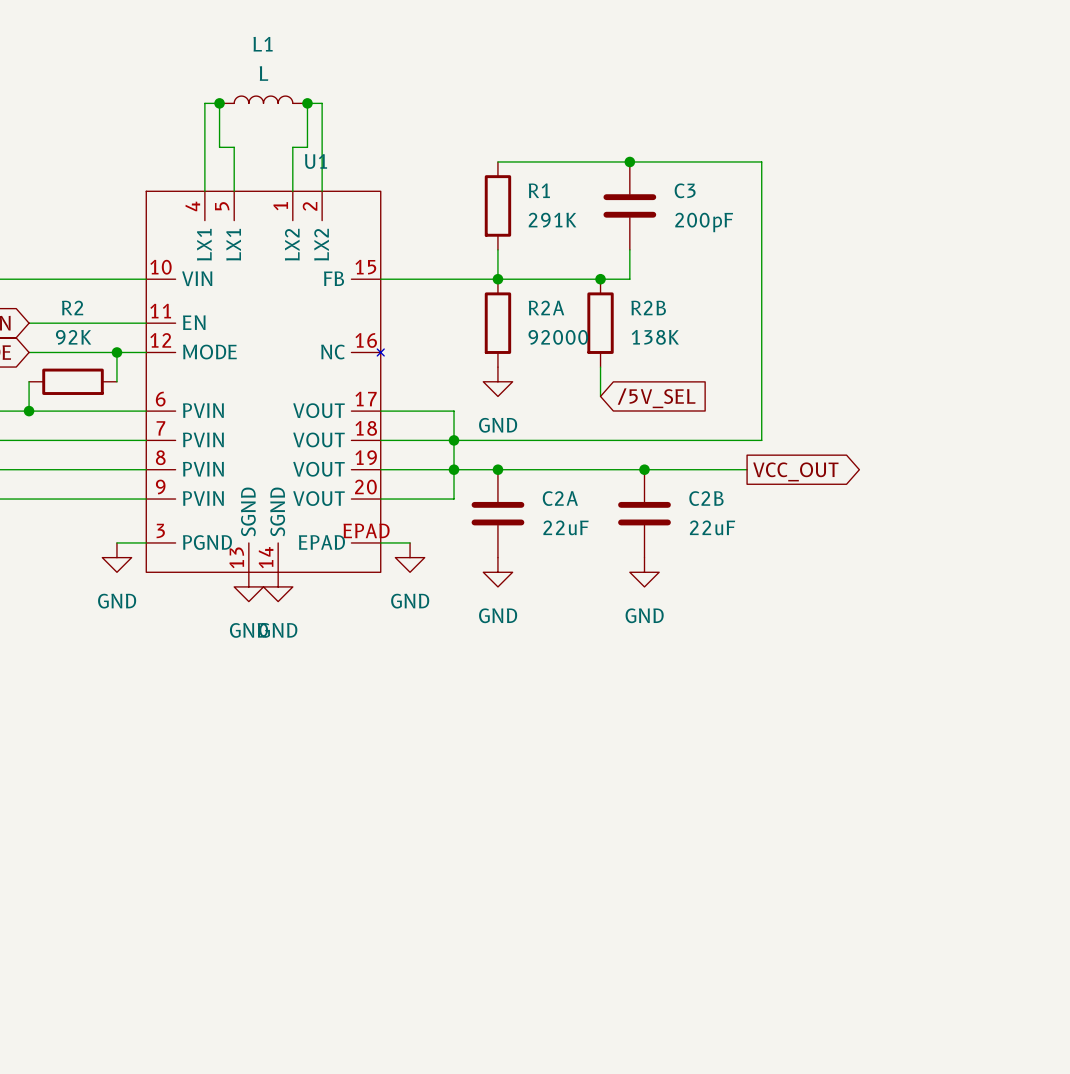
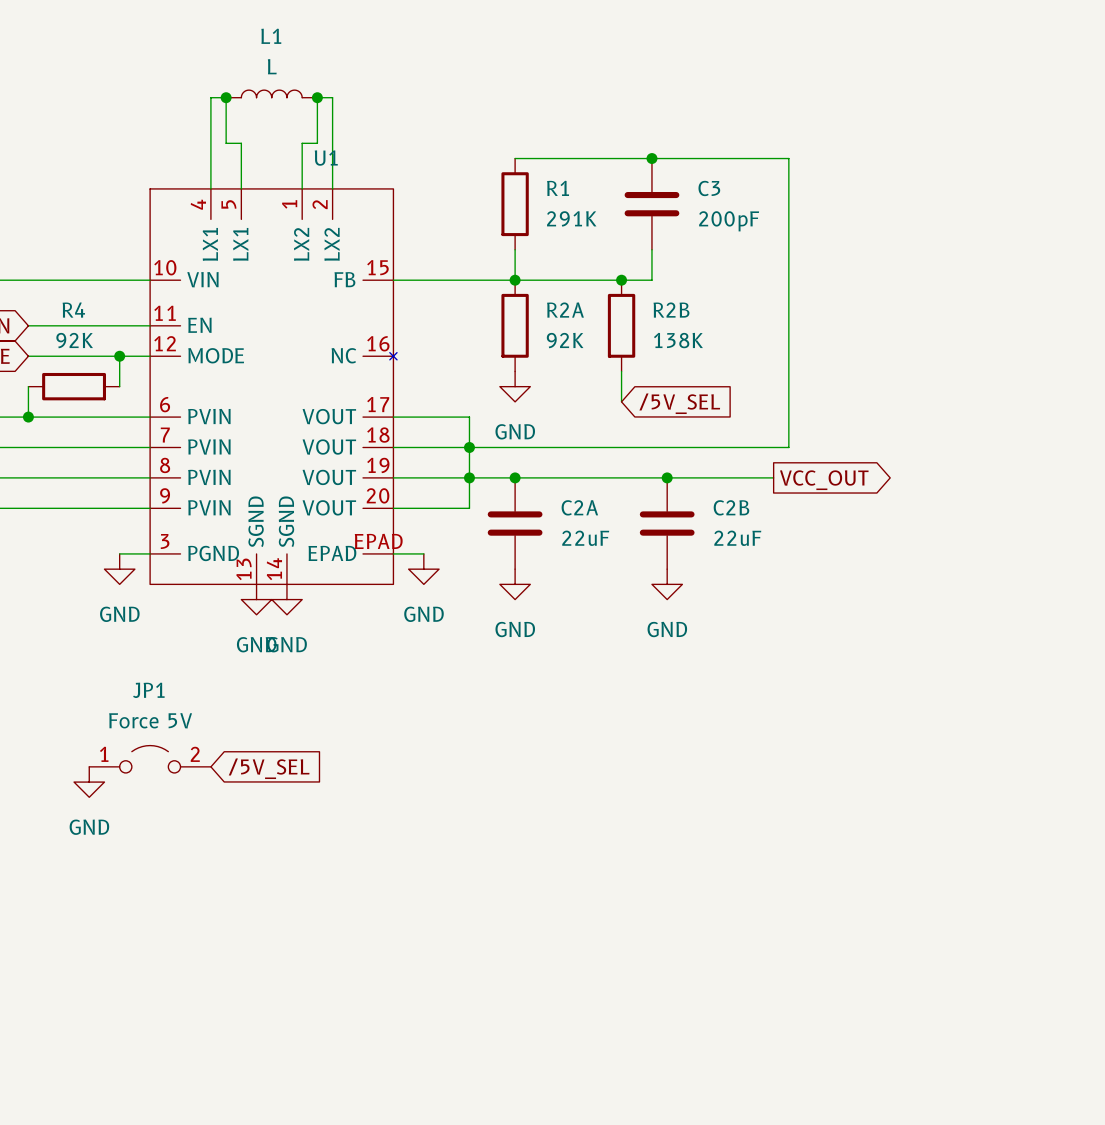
R2 name: R2 (72, 307) -> R4 (73, 310)
R2A value: 92000 (558, 337) -> 92K (565, 340)
JP1: none -> Force 5V (150, 759)
global label: none -> /5V_SEL (269, 768)
power symbol: none -> GND (89, 782)

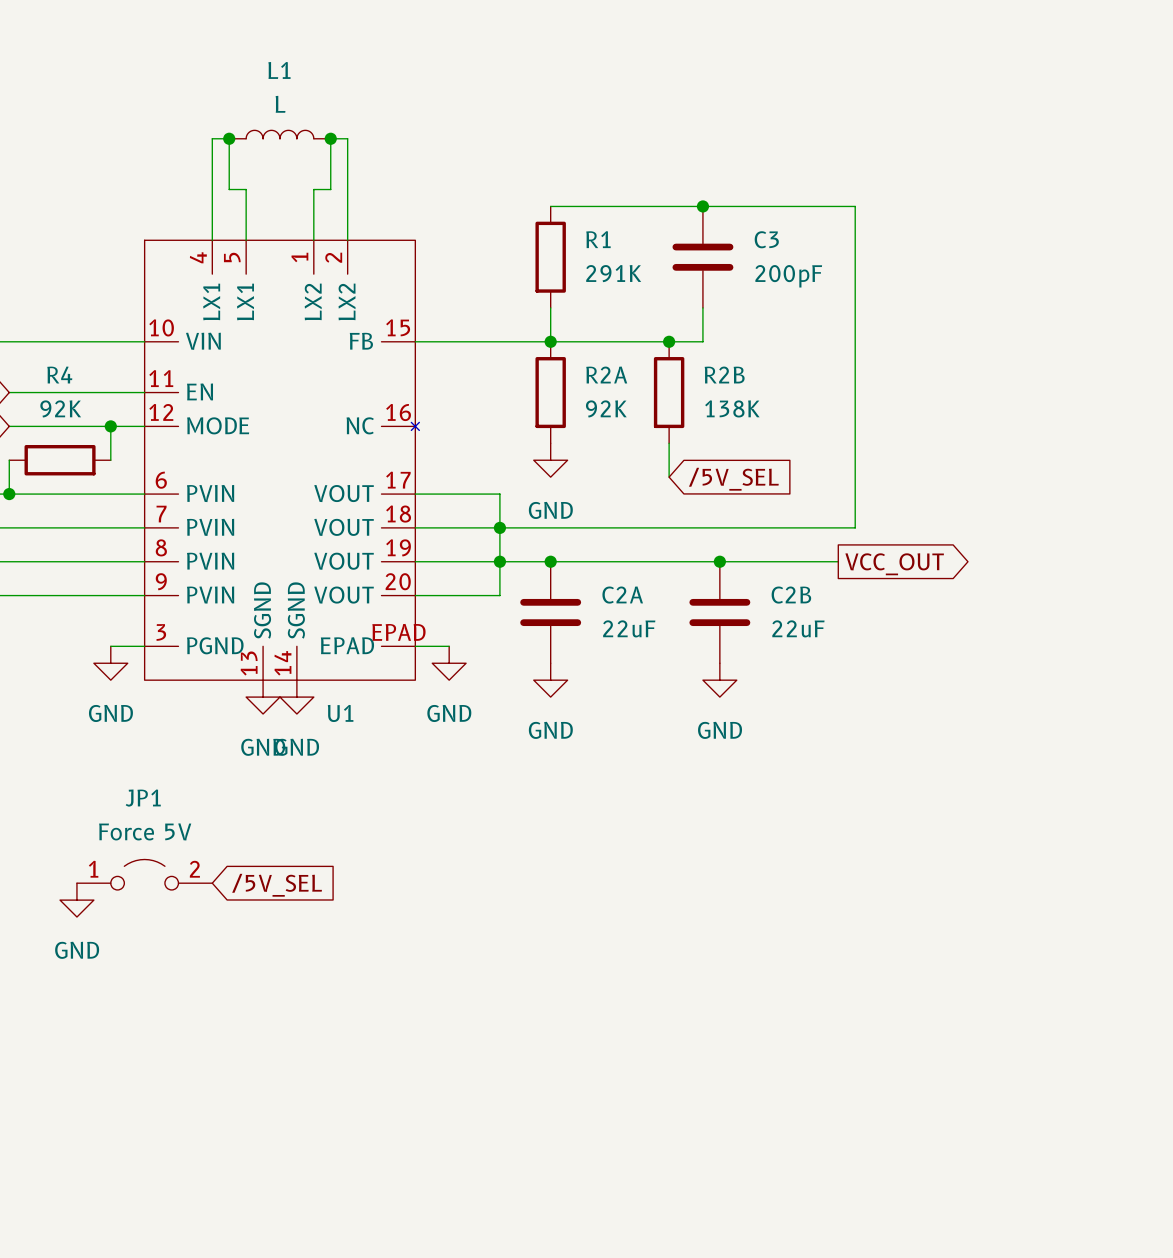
U1 name position: U1 (326, 158) -> U1 (340, 713)

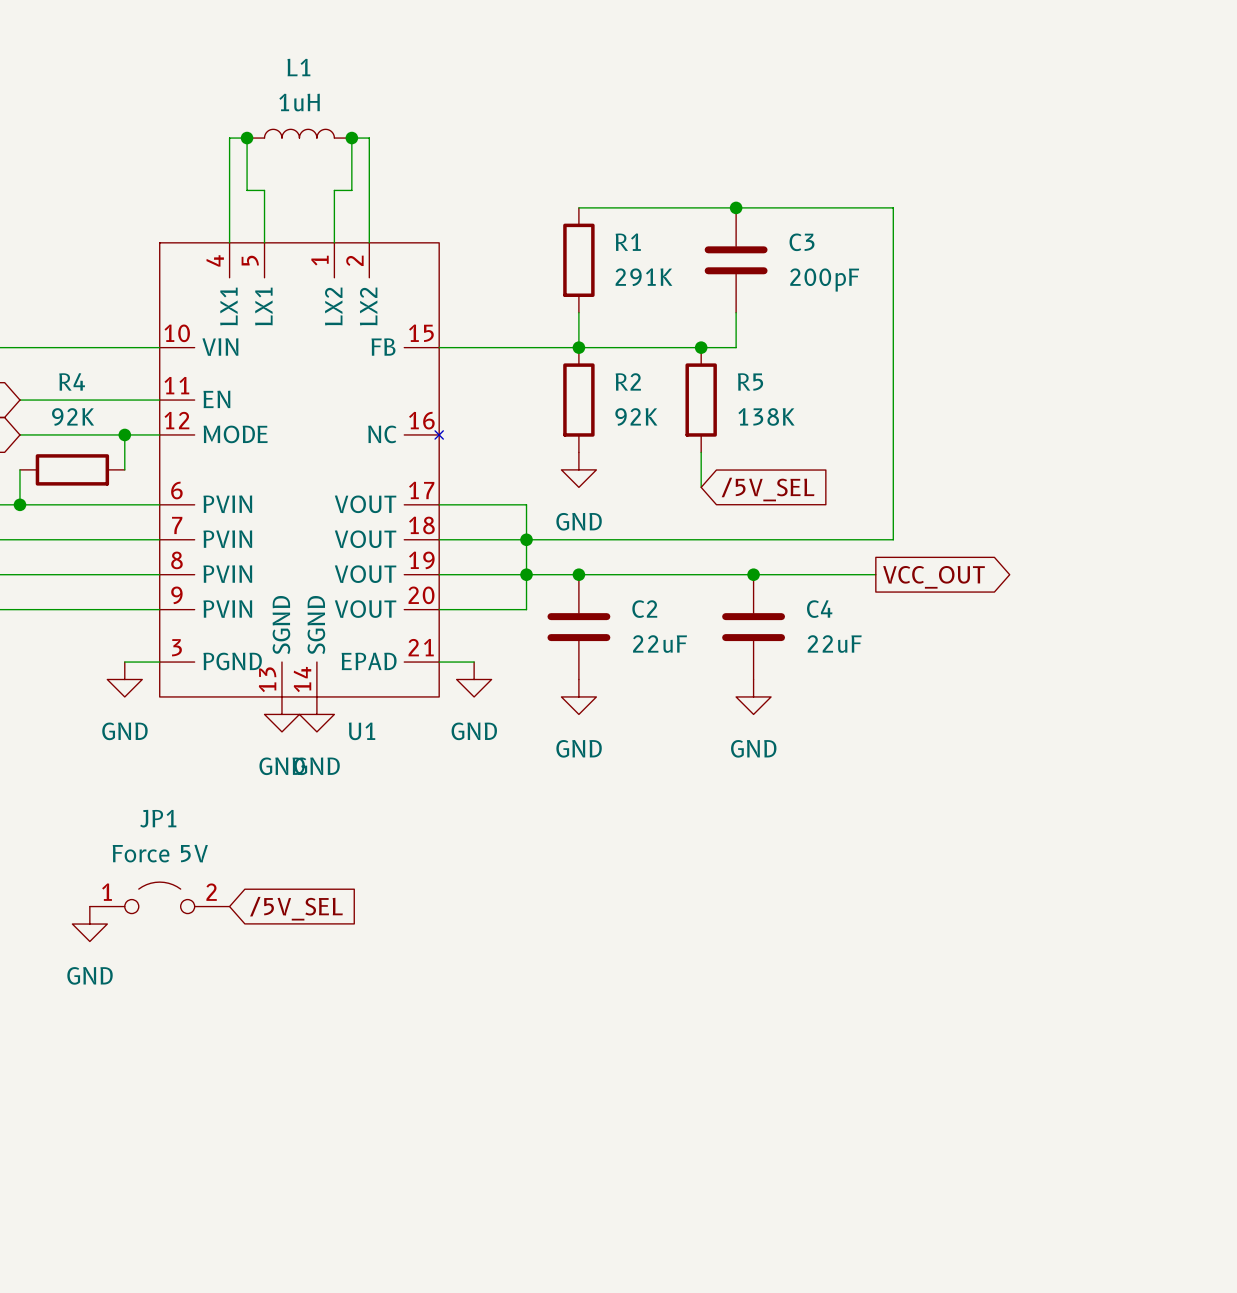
L1 value: L (280, 104) -> 1uH (299, 102)
R2A name: R2A (606, 375) -> R2 (628, 381)
R2B name: R2B (724, 375) -> R5 (750, 381)
C2A name: C2A (622, 595) -> C2 (644, 609)
C2B name: C2B (791, 595) -> C4 (819, 609)
U1 pin number: EPAD (398, 632) -> 21 (421, 647)

